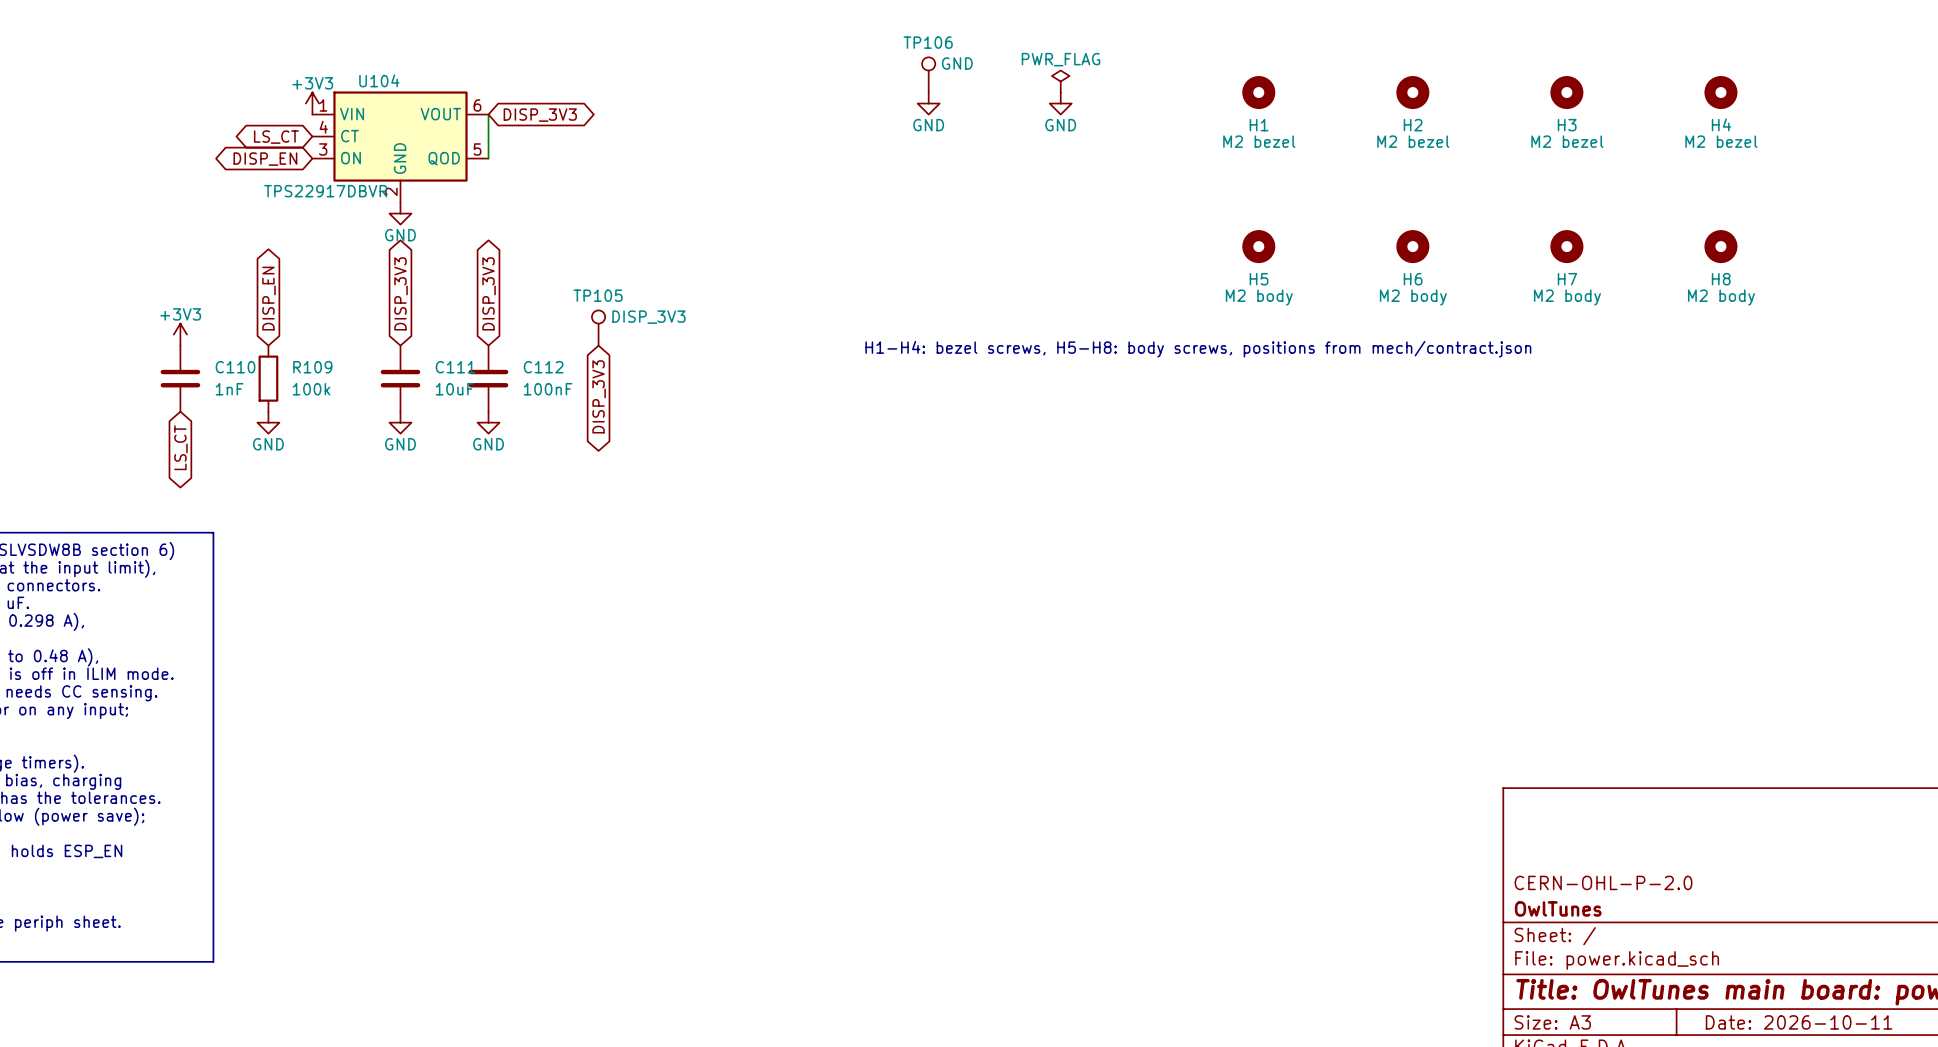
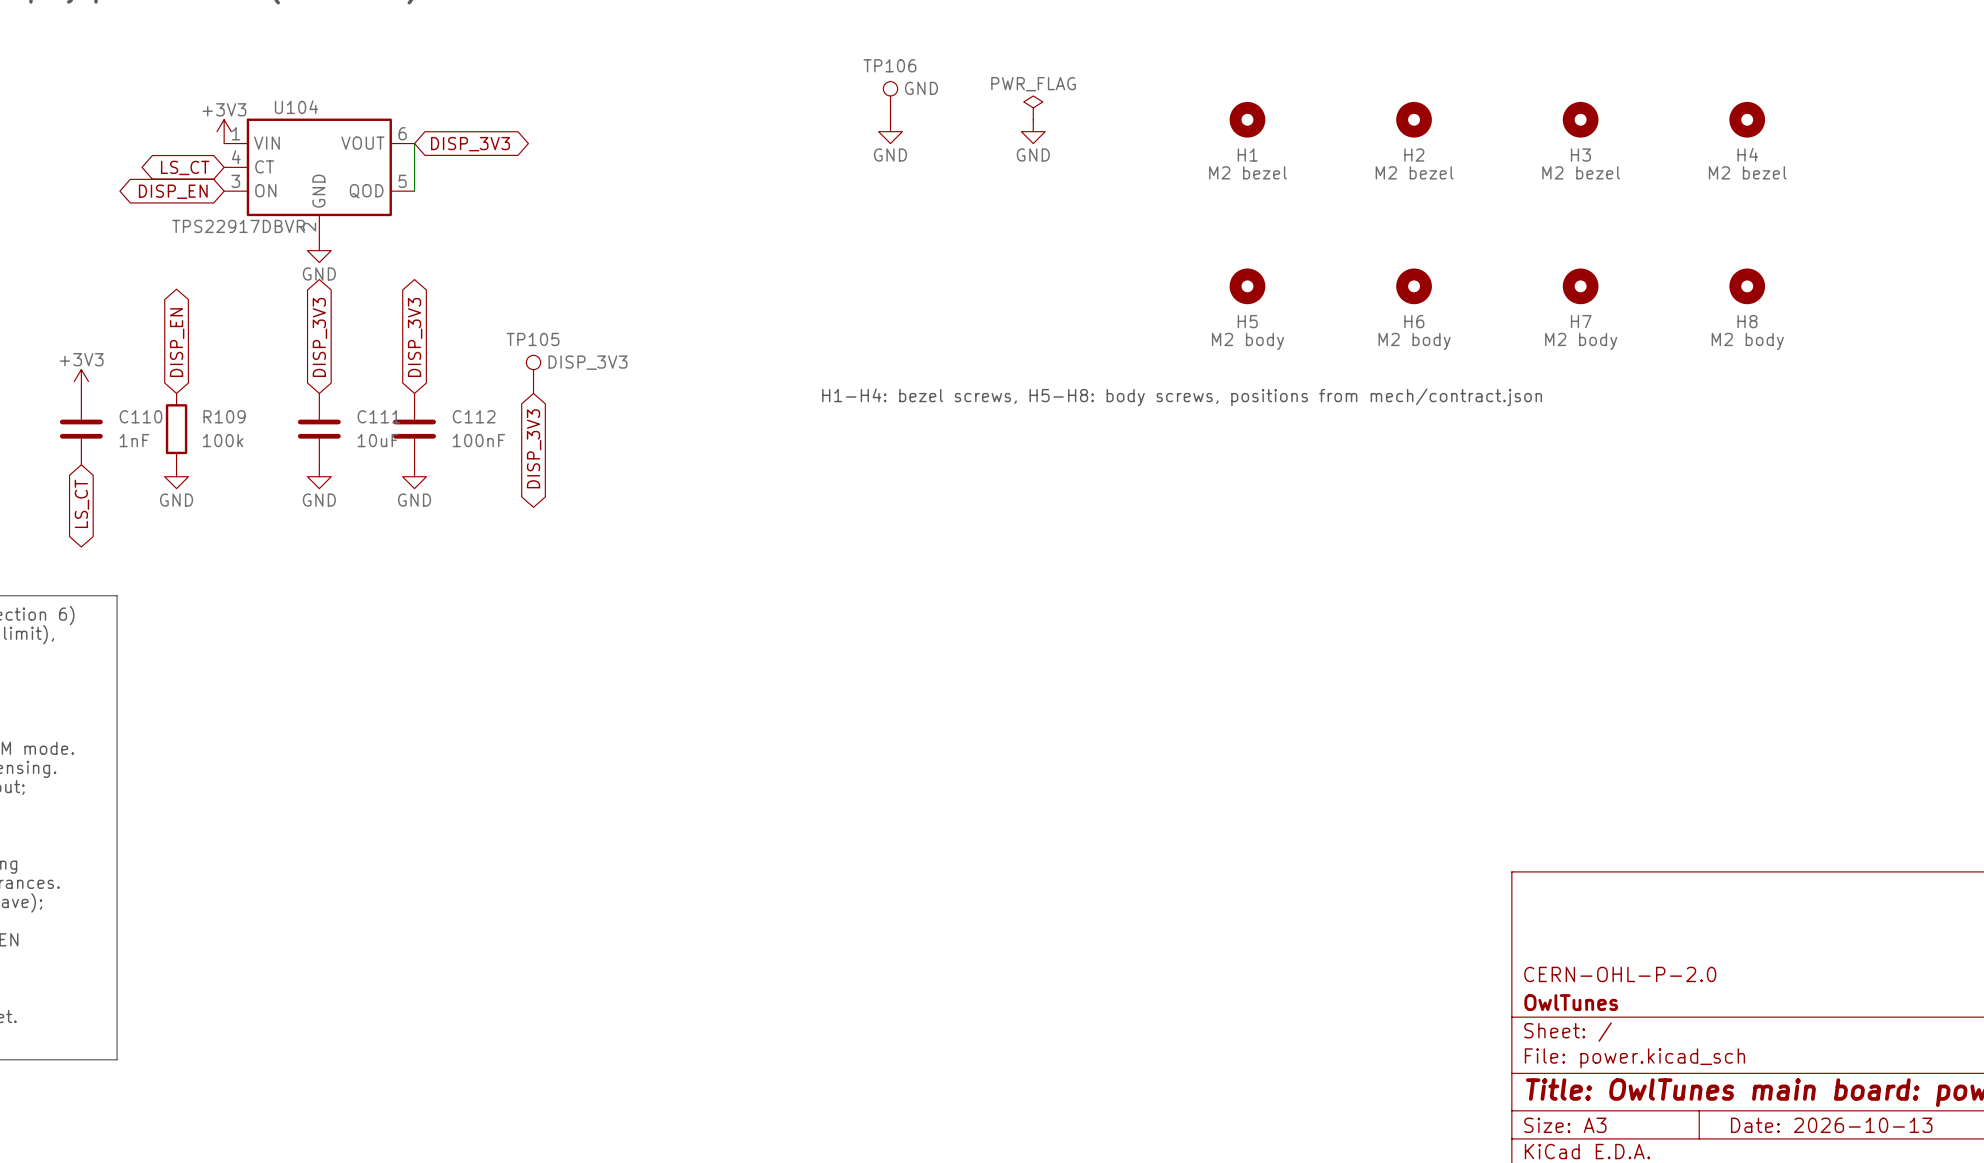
title block: Date: 2026-10-11 (1799, 1022) -> Date: 2026-10-13 (1831, 1125)

